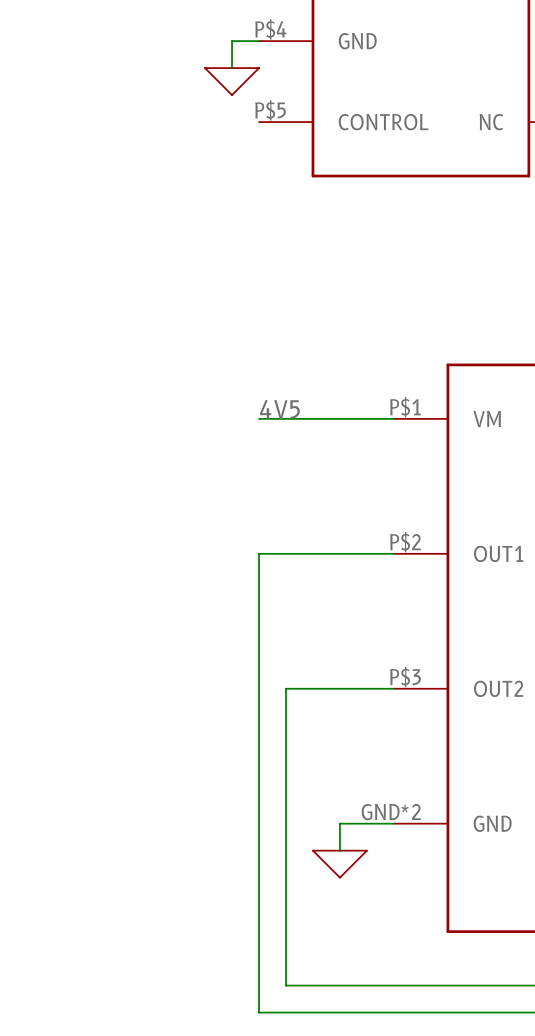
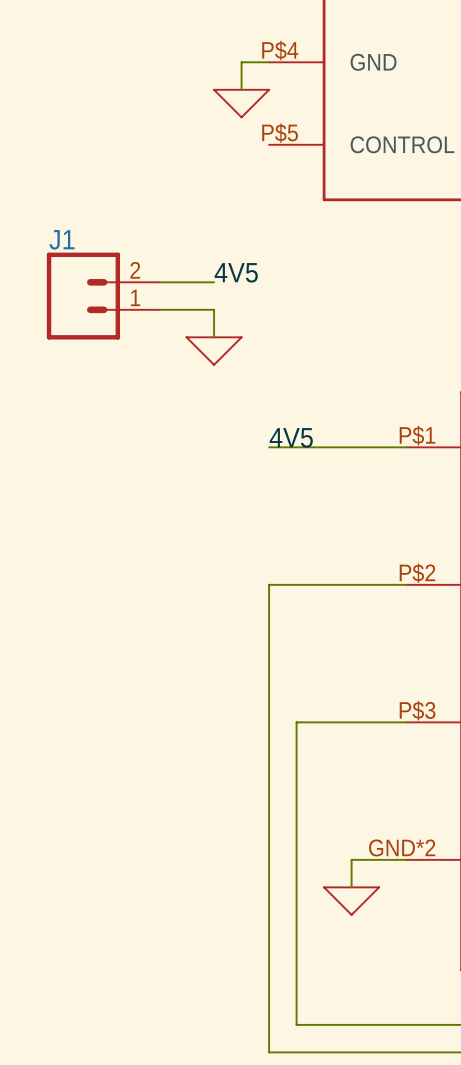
label: none -> 4V5 (236, 272)
wire: none -> (159, 282) (214, 282)
J1: none -> (102, 296)
wire: none -> (159, 309) (214, 309) (214, 337)
power symbol: none -> (214, 351)

